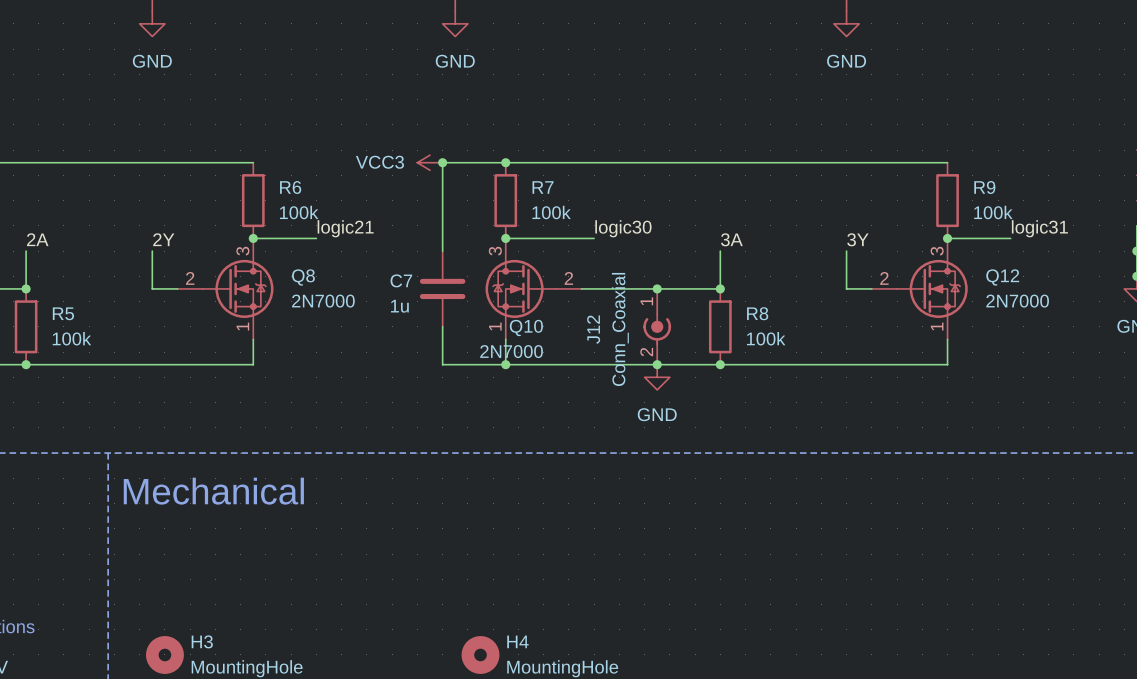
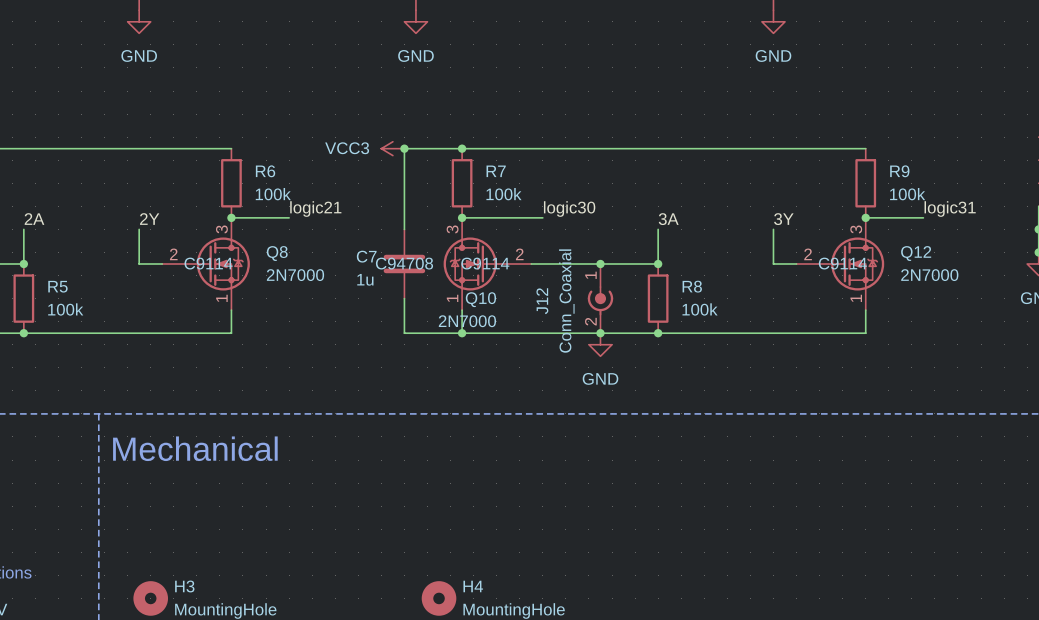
Q8 text: none -> C9114 (208, 263)
C7 text: none -> C94708 (404, 263)
Q10 text: none -> C9114 (485, 263)
Q12 text: none -> C9114 (842, 263)

